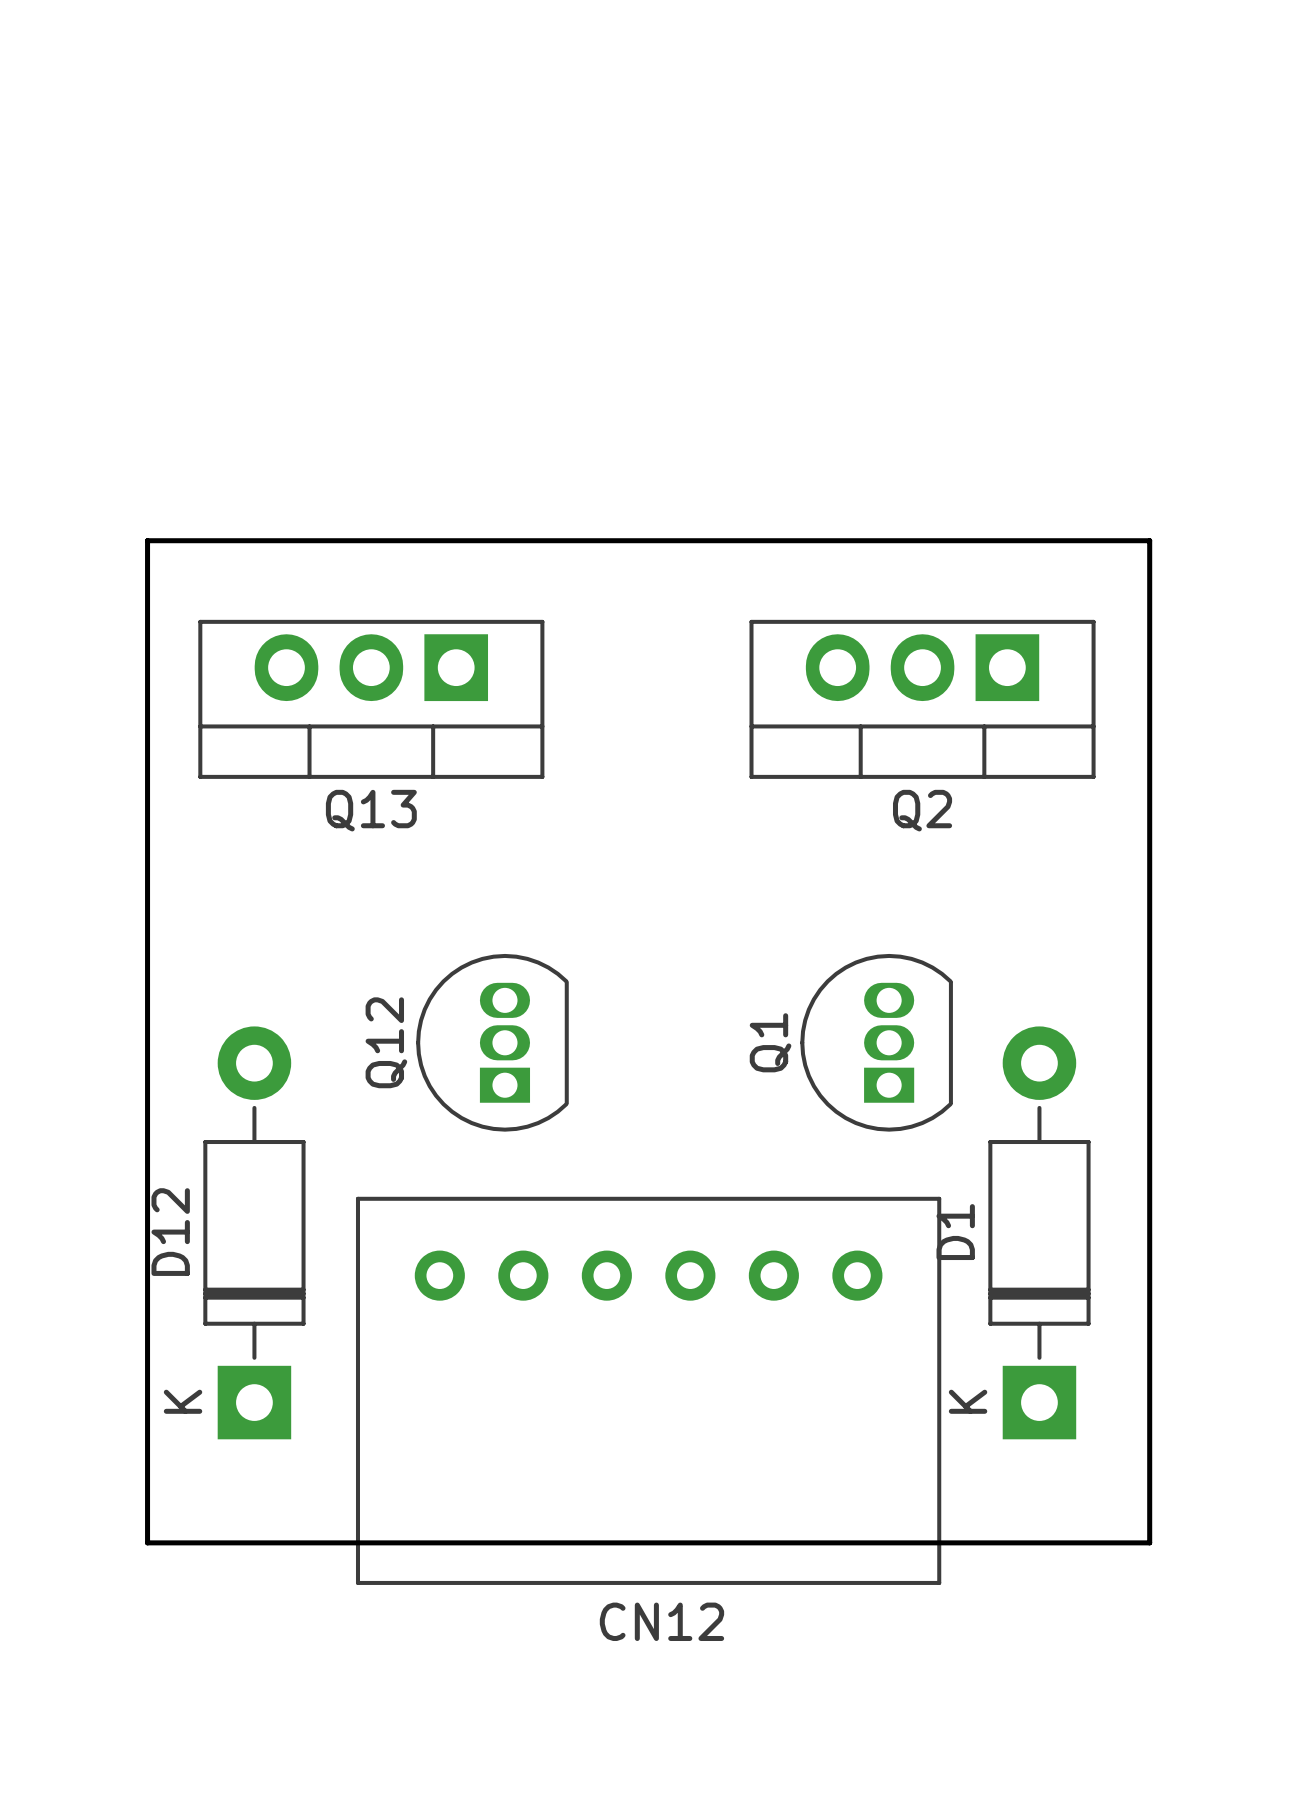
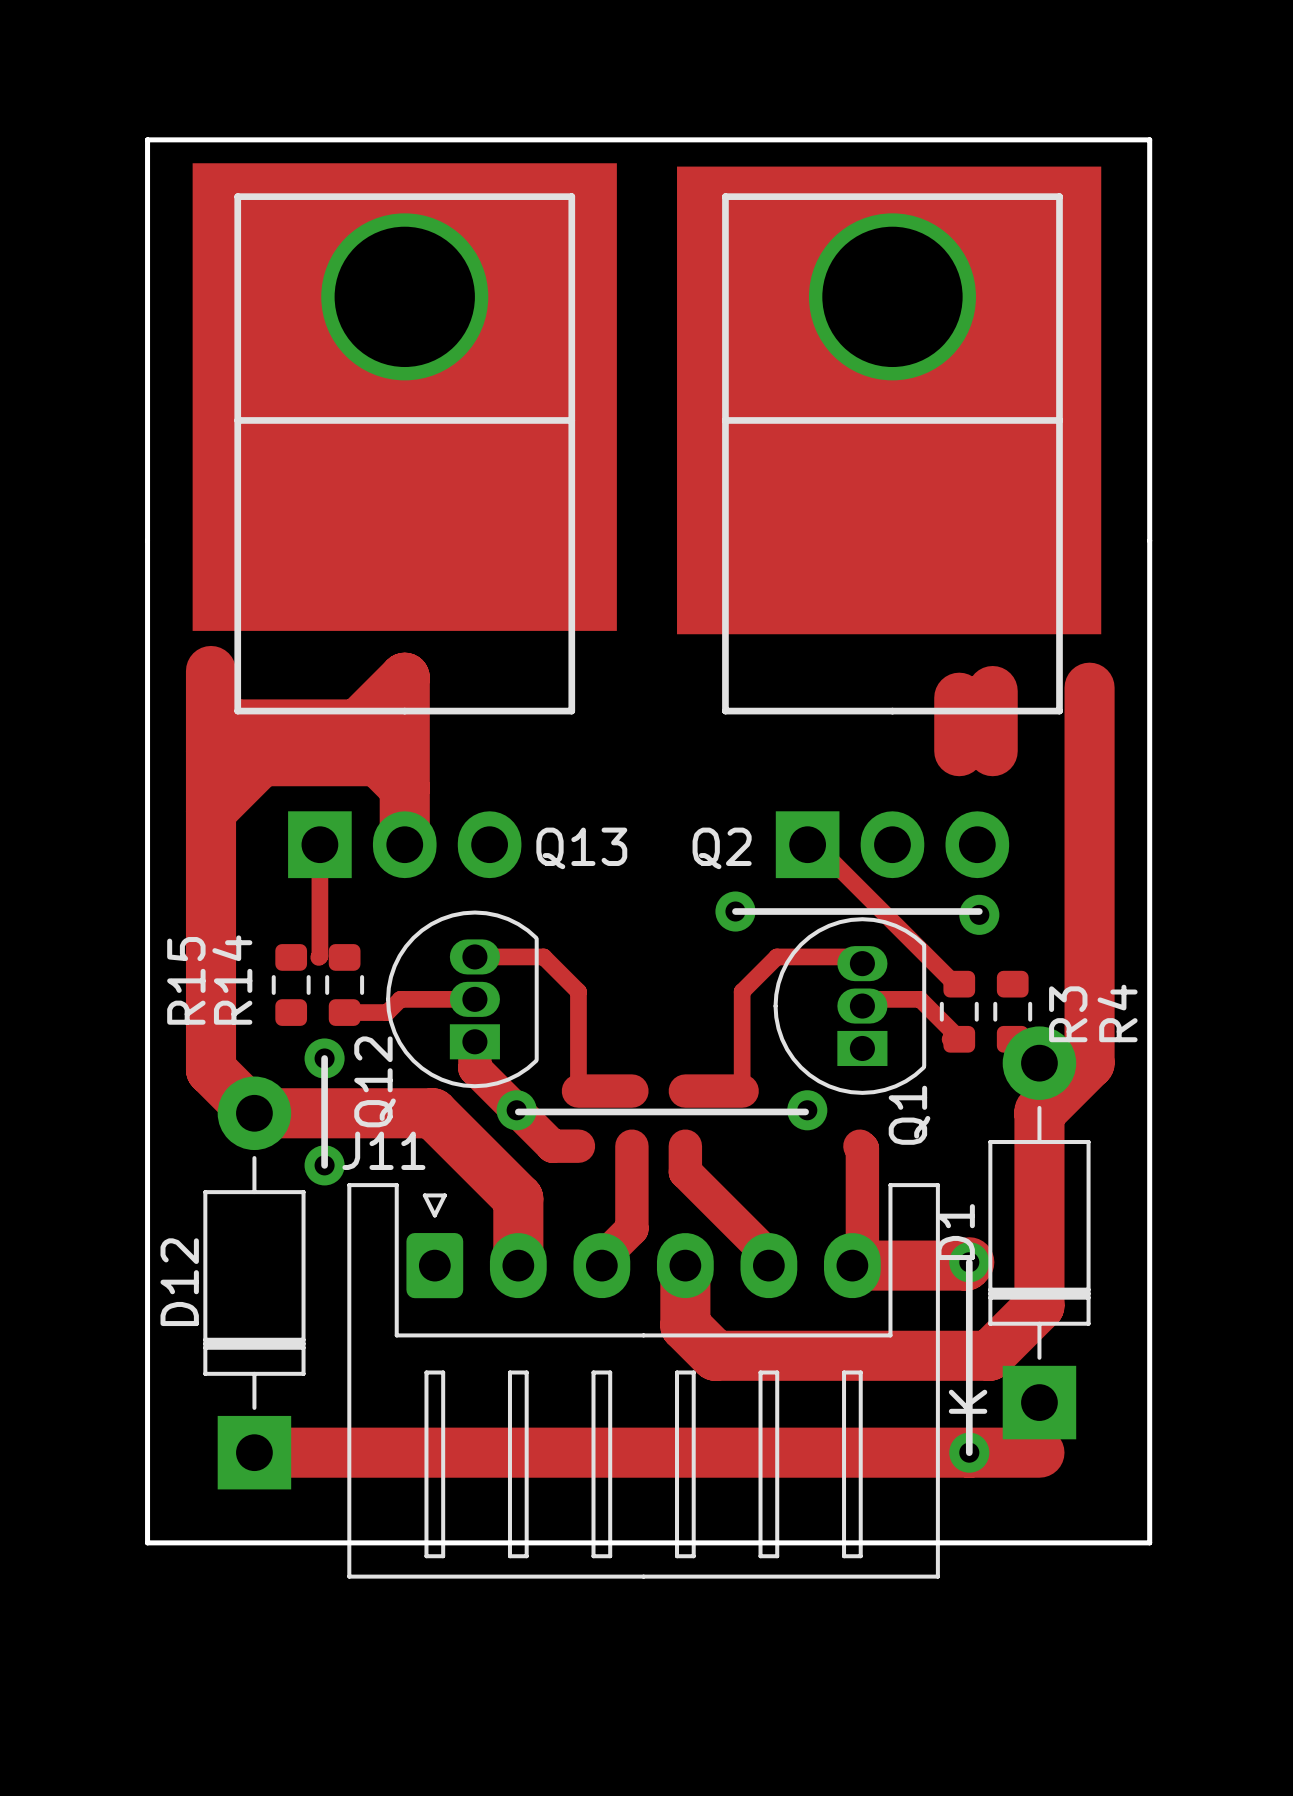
board edge: (147, 540) (1149, 540) -> (147, 540) (147, 139) (1149, 139) (1149, 540)
Q13 footprint: [198, 619, 545, 779] -> [192, 163, 617, 879]
Q2 footprint: [749, 619, 1096, 779] -> [677, 166, 1102, 879]
track: none -> (211, 670) (211, 1069) (254, 1113) (432, 1113) (518, 1198) (518, 1265)
track: none -> (1089, 687) (1089, 1063) (1039, 1113)
track: none -> (992, 691) (992, 751)
track: none -> (959, 697) (959, 751)
track: none -> (211, 751) (237, 724) (357, 724) (404, 677) (404, 844)
track: none -> (404, 787) (378, 761) (261, 761) (211, 811)
Q13 name position: Q13 (371, 810) -> Q13 (581, 848)
Q2 name position: Q2 (922, 810) -> Q2 (722, 848)
track: none -> (319, 844) (318, 957)
track: none -> (807, 844) (815, 844) (955, 984)
line: none -> (735, 911) (979, 911)
via: none -> (735, 911)
via: none -> (979, 914)
track: none -> (474, 956) (543, 956) (578, 991) (578, 1091) (631, 1091)
track: none -> (862, 956) (776, 956) (742, 991) (742, 1091) (685, 1091)
R15: none -> (291, 985)
R14: none -> (344, 985)
track: none -> (474, 999) (400, 999) (387, 1012) (344, 1012)
track: none -> (862, 999) (920, 999) (959, 1038) (950, 1039)
R3: none -> (959, 1011)
R4: none -> (1012, 1011)
track: none -> (474, 1041) (474, 1068) (552, 1146) (578, 1146)
Q12 name position: Q12 (386, 1042) -> Q12 (375, 1081)
Q12 position: (492, 1042) -> (462, 999)
Q1 name position: Q1 (770, 1042) -> Q1 (909, 1115)
Q1 position: (876, 1042) -> (849, 1006)
line: none -> (324, 1058) (324, 1165)
via: none -> (324, 1058)
via: none -> (516, 1110)
via: none -> (807, 1110)
line: none -> (518, 1111) (805, 1111)
track: none -> (1039, 1111) (1039, 1305) (989, 1355) (715, 1355) (685, 1325) (685, 1265)
track: none -> (631, 1146) (631, 1228) (601, 1258) (601, 1265)
track: none -> (685, 1146) (685, 1172) (768, 1255) (768, 1265)
track: none -> (859, 1146) (862, 1148) (862, 1255) (852, 1265) (965, 1265) (969, 1262)
via: none -> (324, 1165)
D12 name position: D12 (170, 1232) -> D12 (179, 1282)
D12 position: (254, 1232) -> (254, 1282)
line: none -> (969, 1262) (969, 1452)
via: none -> (969, 1262)
J11: none -> (643, 1380)
CN12: (648, 1390) -> none
D12 text: K (183, 1401) -> none
track: none -> (254, 1452) (1039, 1452)
via: none -> (969, 1452)

